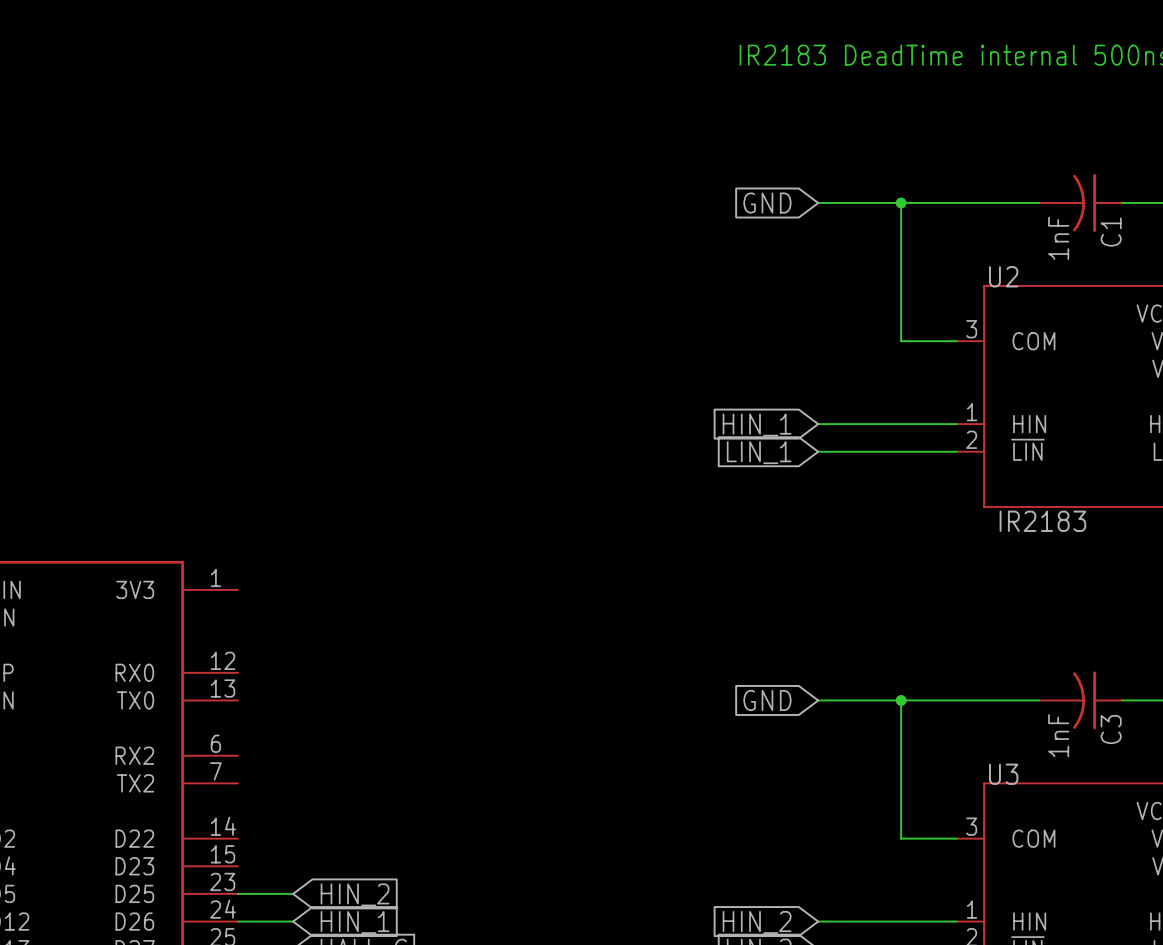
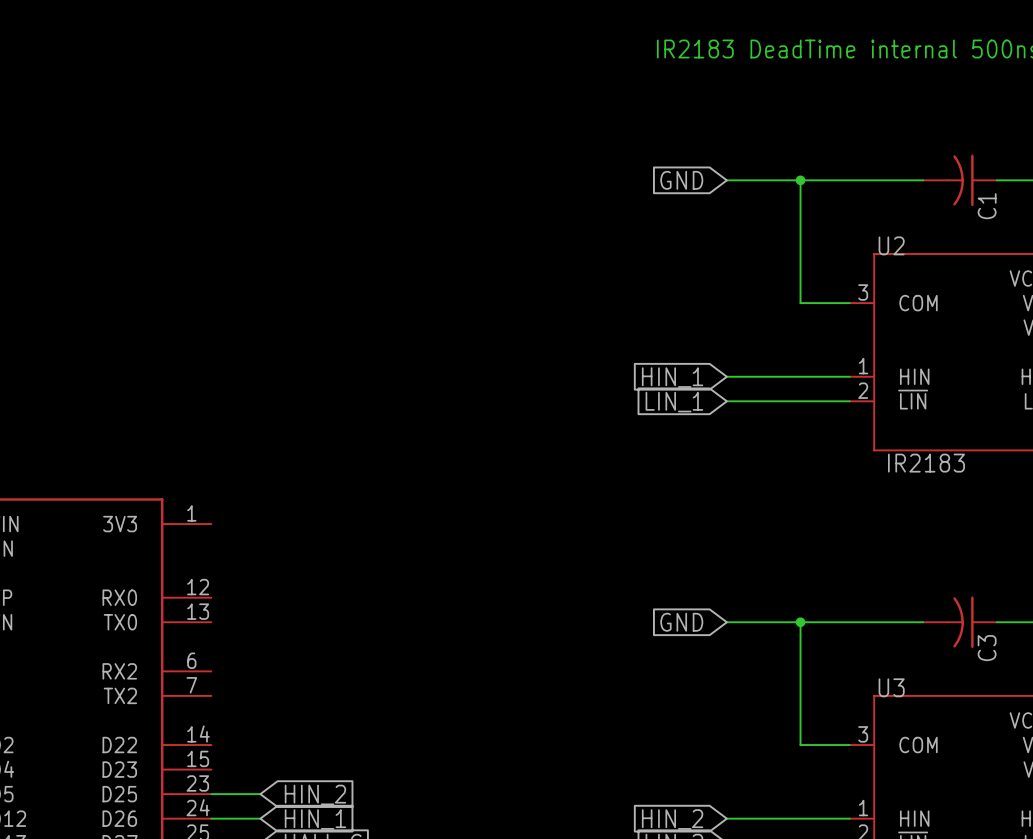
C1 value: 1nF (1058, 238) -> none
C3 value: 1nF (1058, 735) -> none

